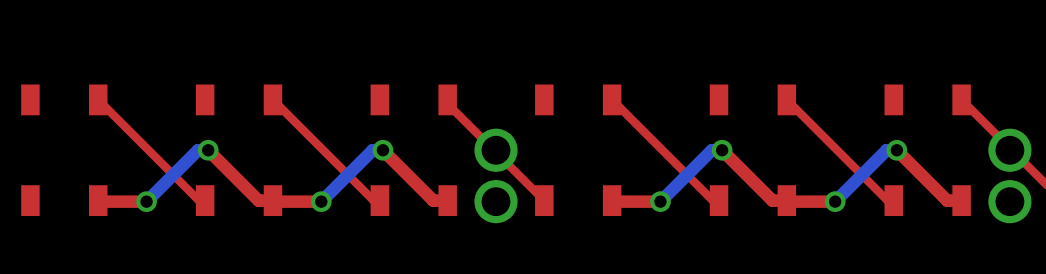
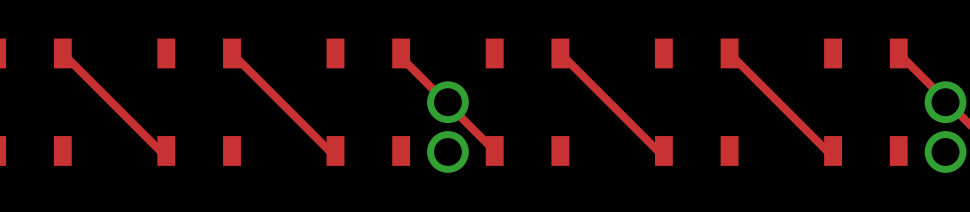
top track: (208, 150) (258, 200) (321, 201) -> none
bottom track: (208, 150) (197, 150) (146, 201) -> none
via: (208, 150) -> none
top track: (382, 150) (433, 200) (447, 200) -> none
bottom track: (382, 150) (372, 150) (321, 201) -> none
via: (382, 150) -> none
top track: (722, 150) (772, 200) (835, 201) -> none
bottom track: (722, 150) (711, 150) (660, 201) -> none
via: (722, 150) -> none
top track: (896, 150) (947, 200) (961, 200) -> none
bottom track: (896, 150) (886, 150) (835, 201) -> none
via: (896, 150) -> none
top track: (98, 200) (146, 201) -> none
top track: (612, 200) (660, 201) -> none
via: (146, 201) -> none
via: (321, 201) -> none
via: (660, 201) -> none
via: (835, 201) -> none

